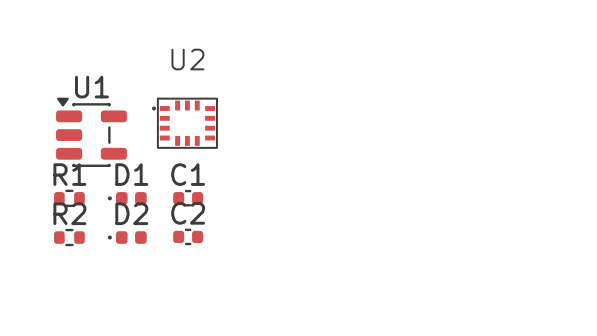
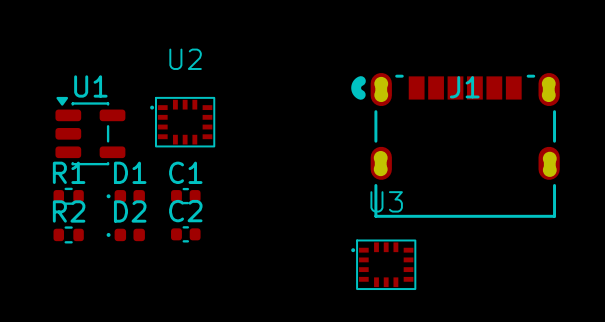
J1: none -> (455, 145)
U3: none -> (383, 264)

